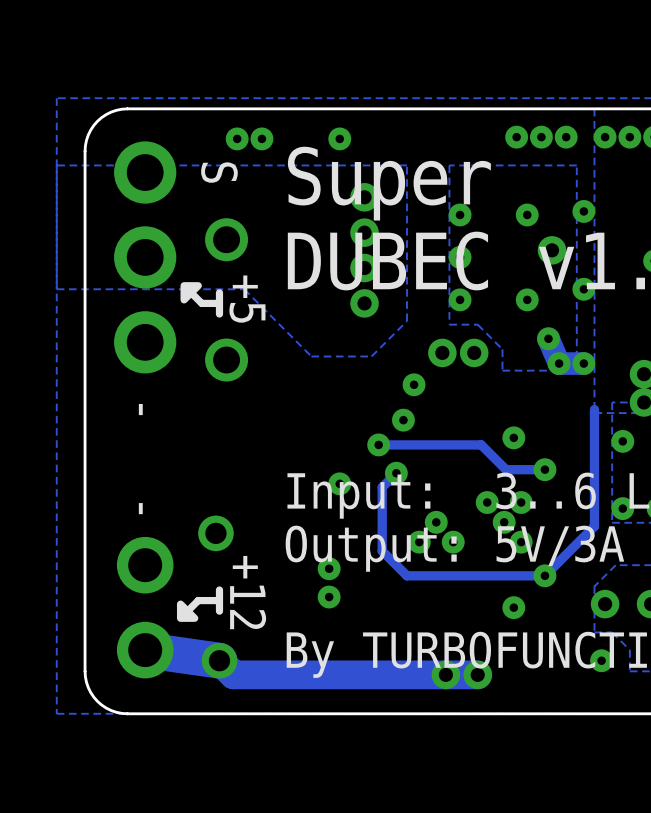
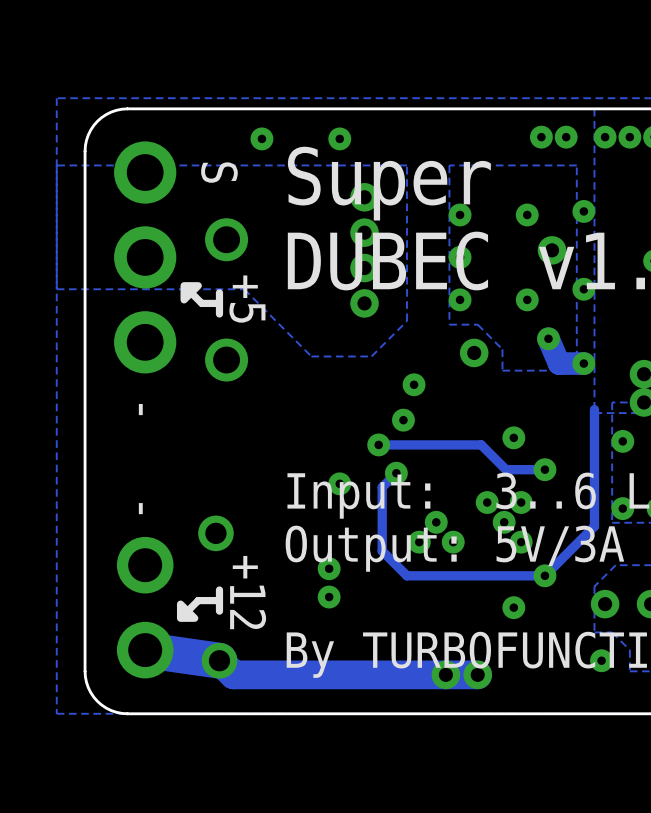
via: (516, 137) -> none
via: (237, 138) -> none
via: (442, 352) -> none
via: (559, 363) -> none

